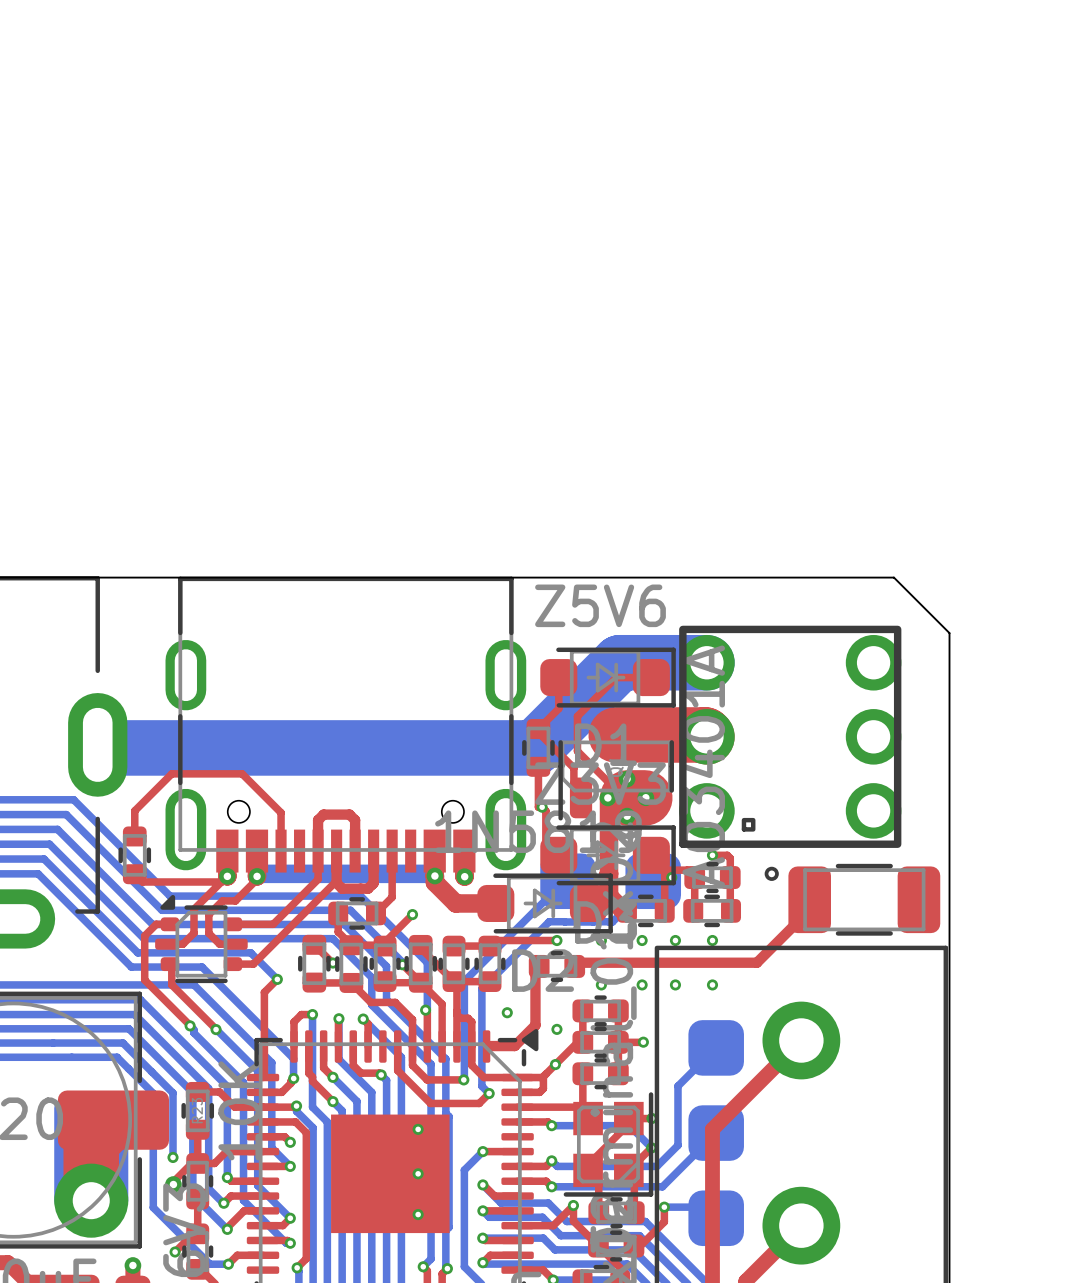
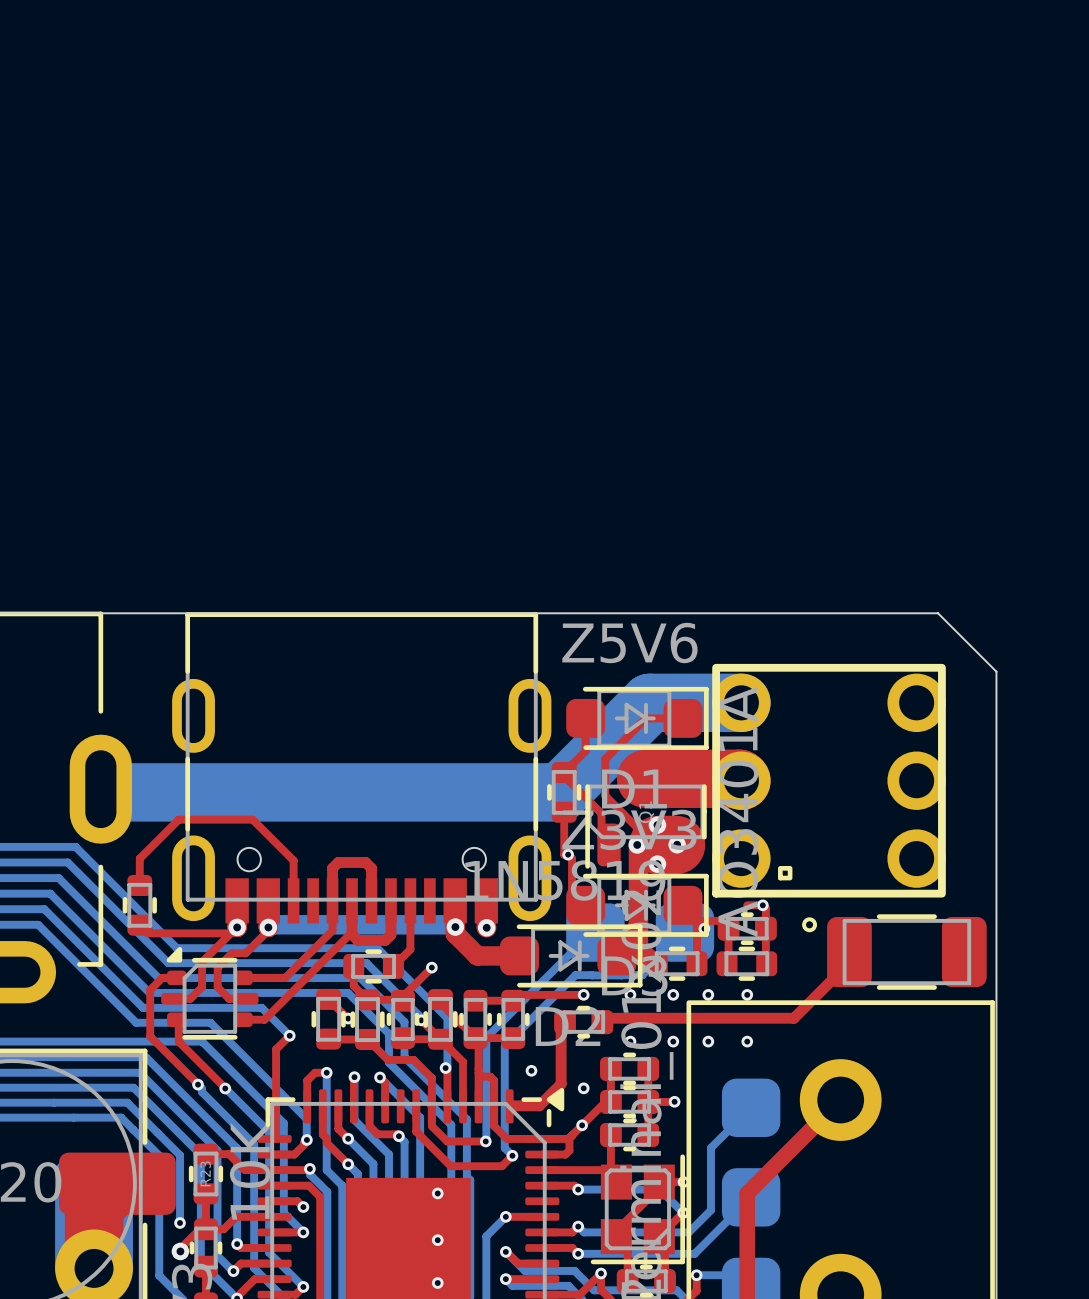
via position: (712, 855) -> (762, 905)

